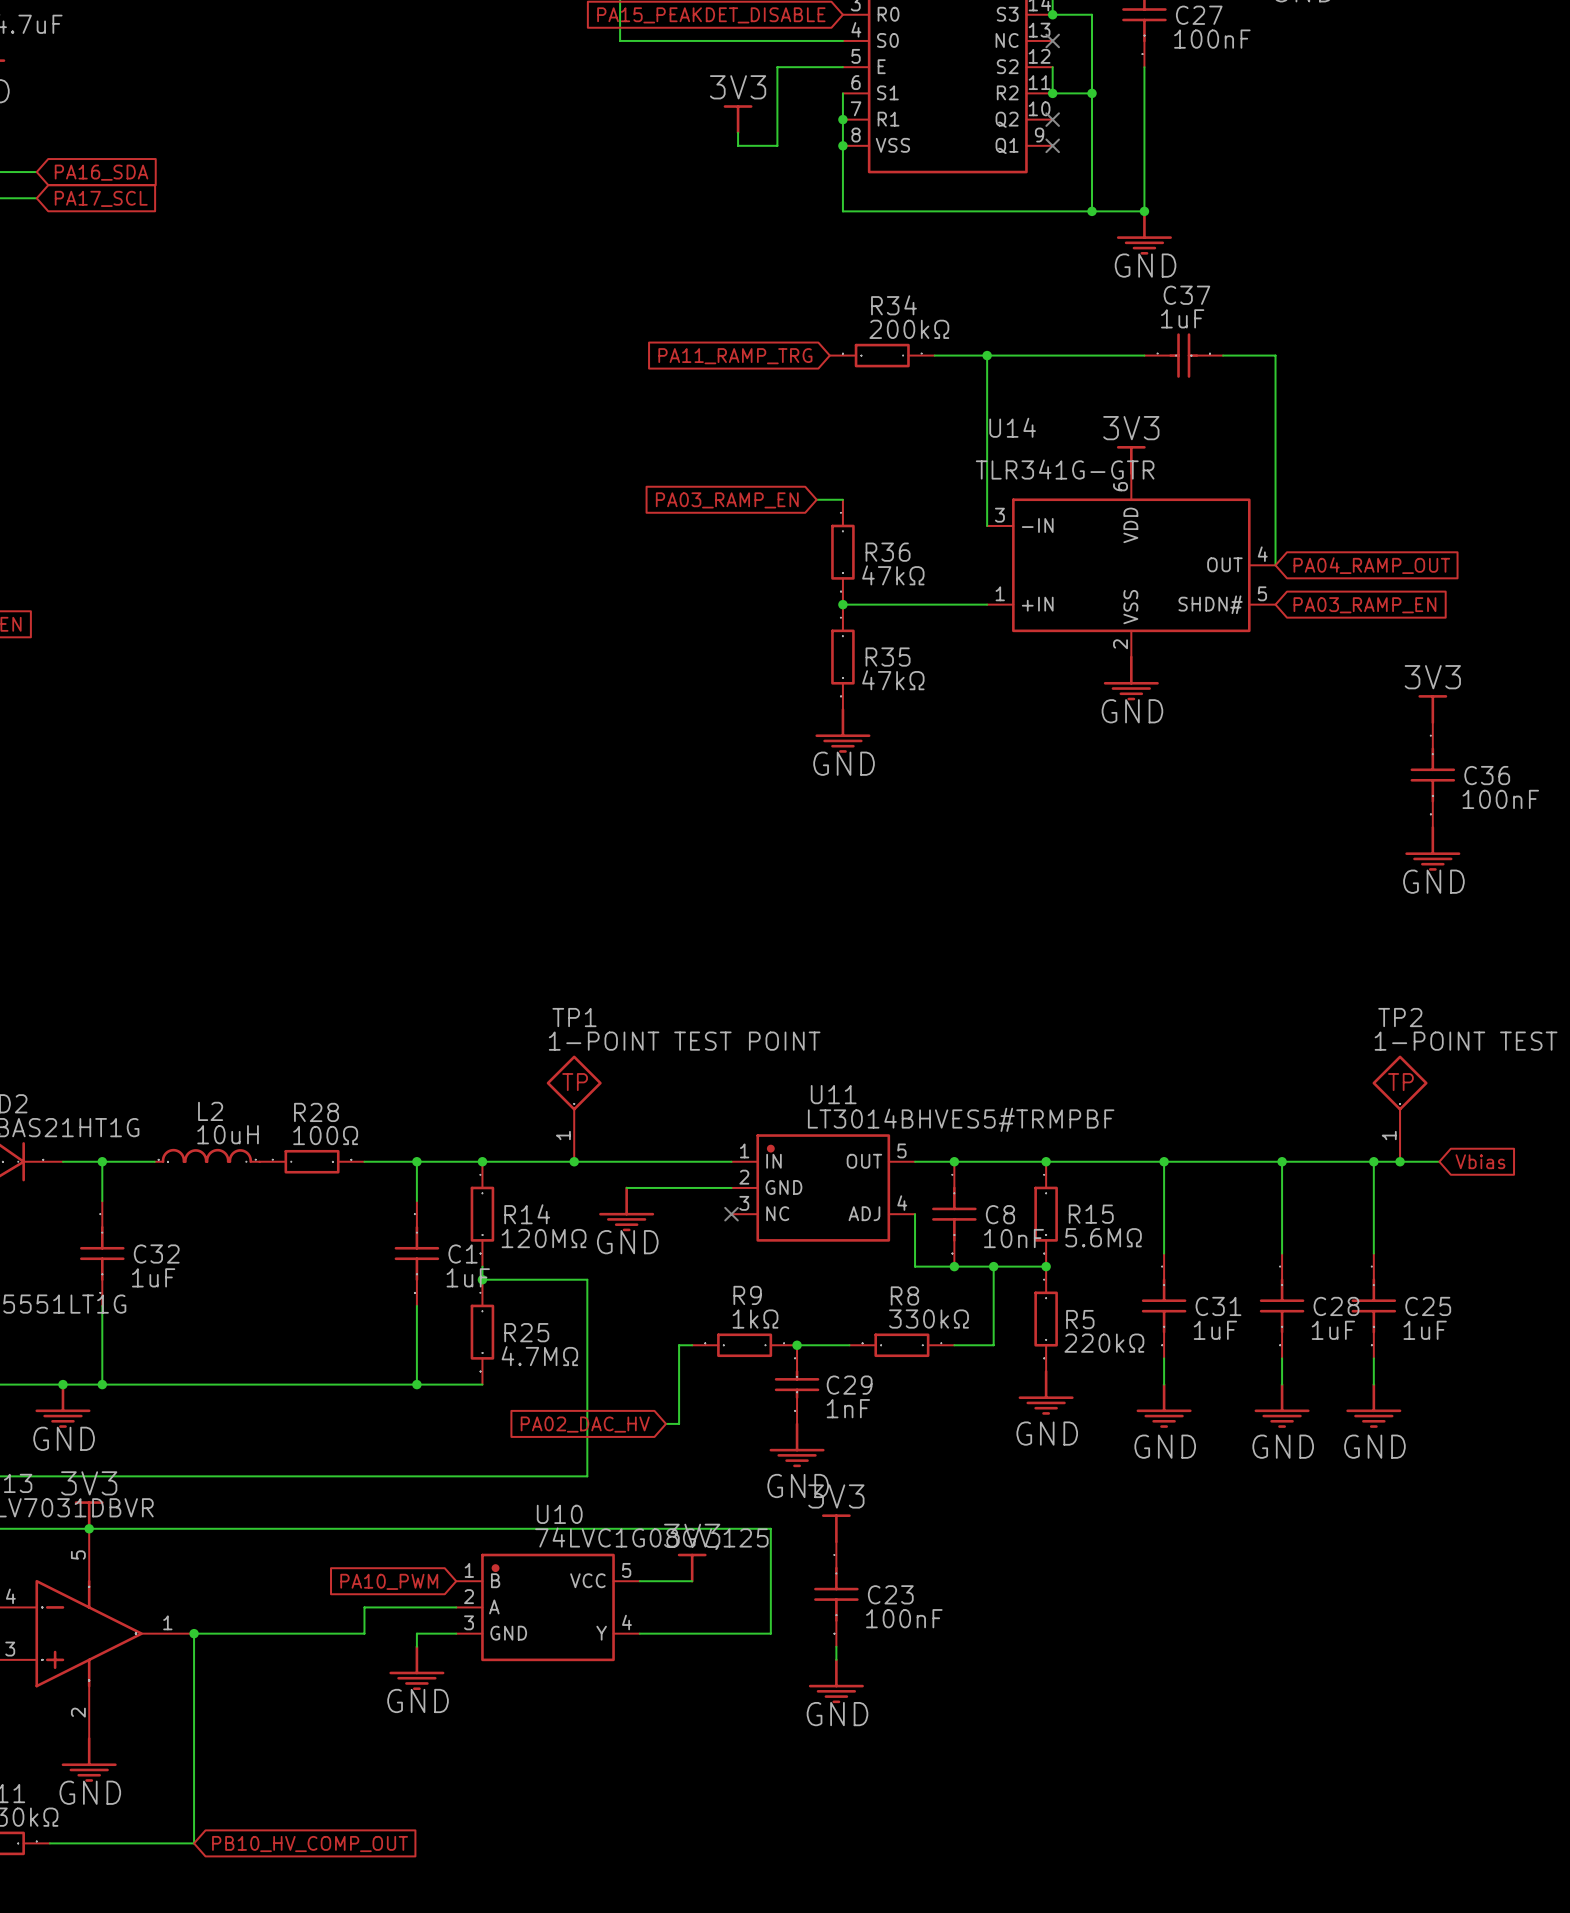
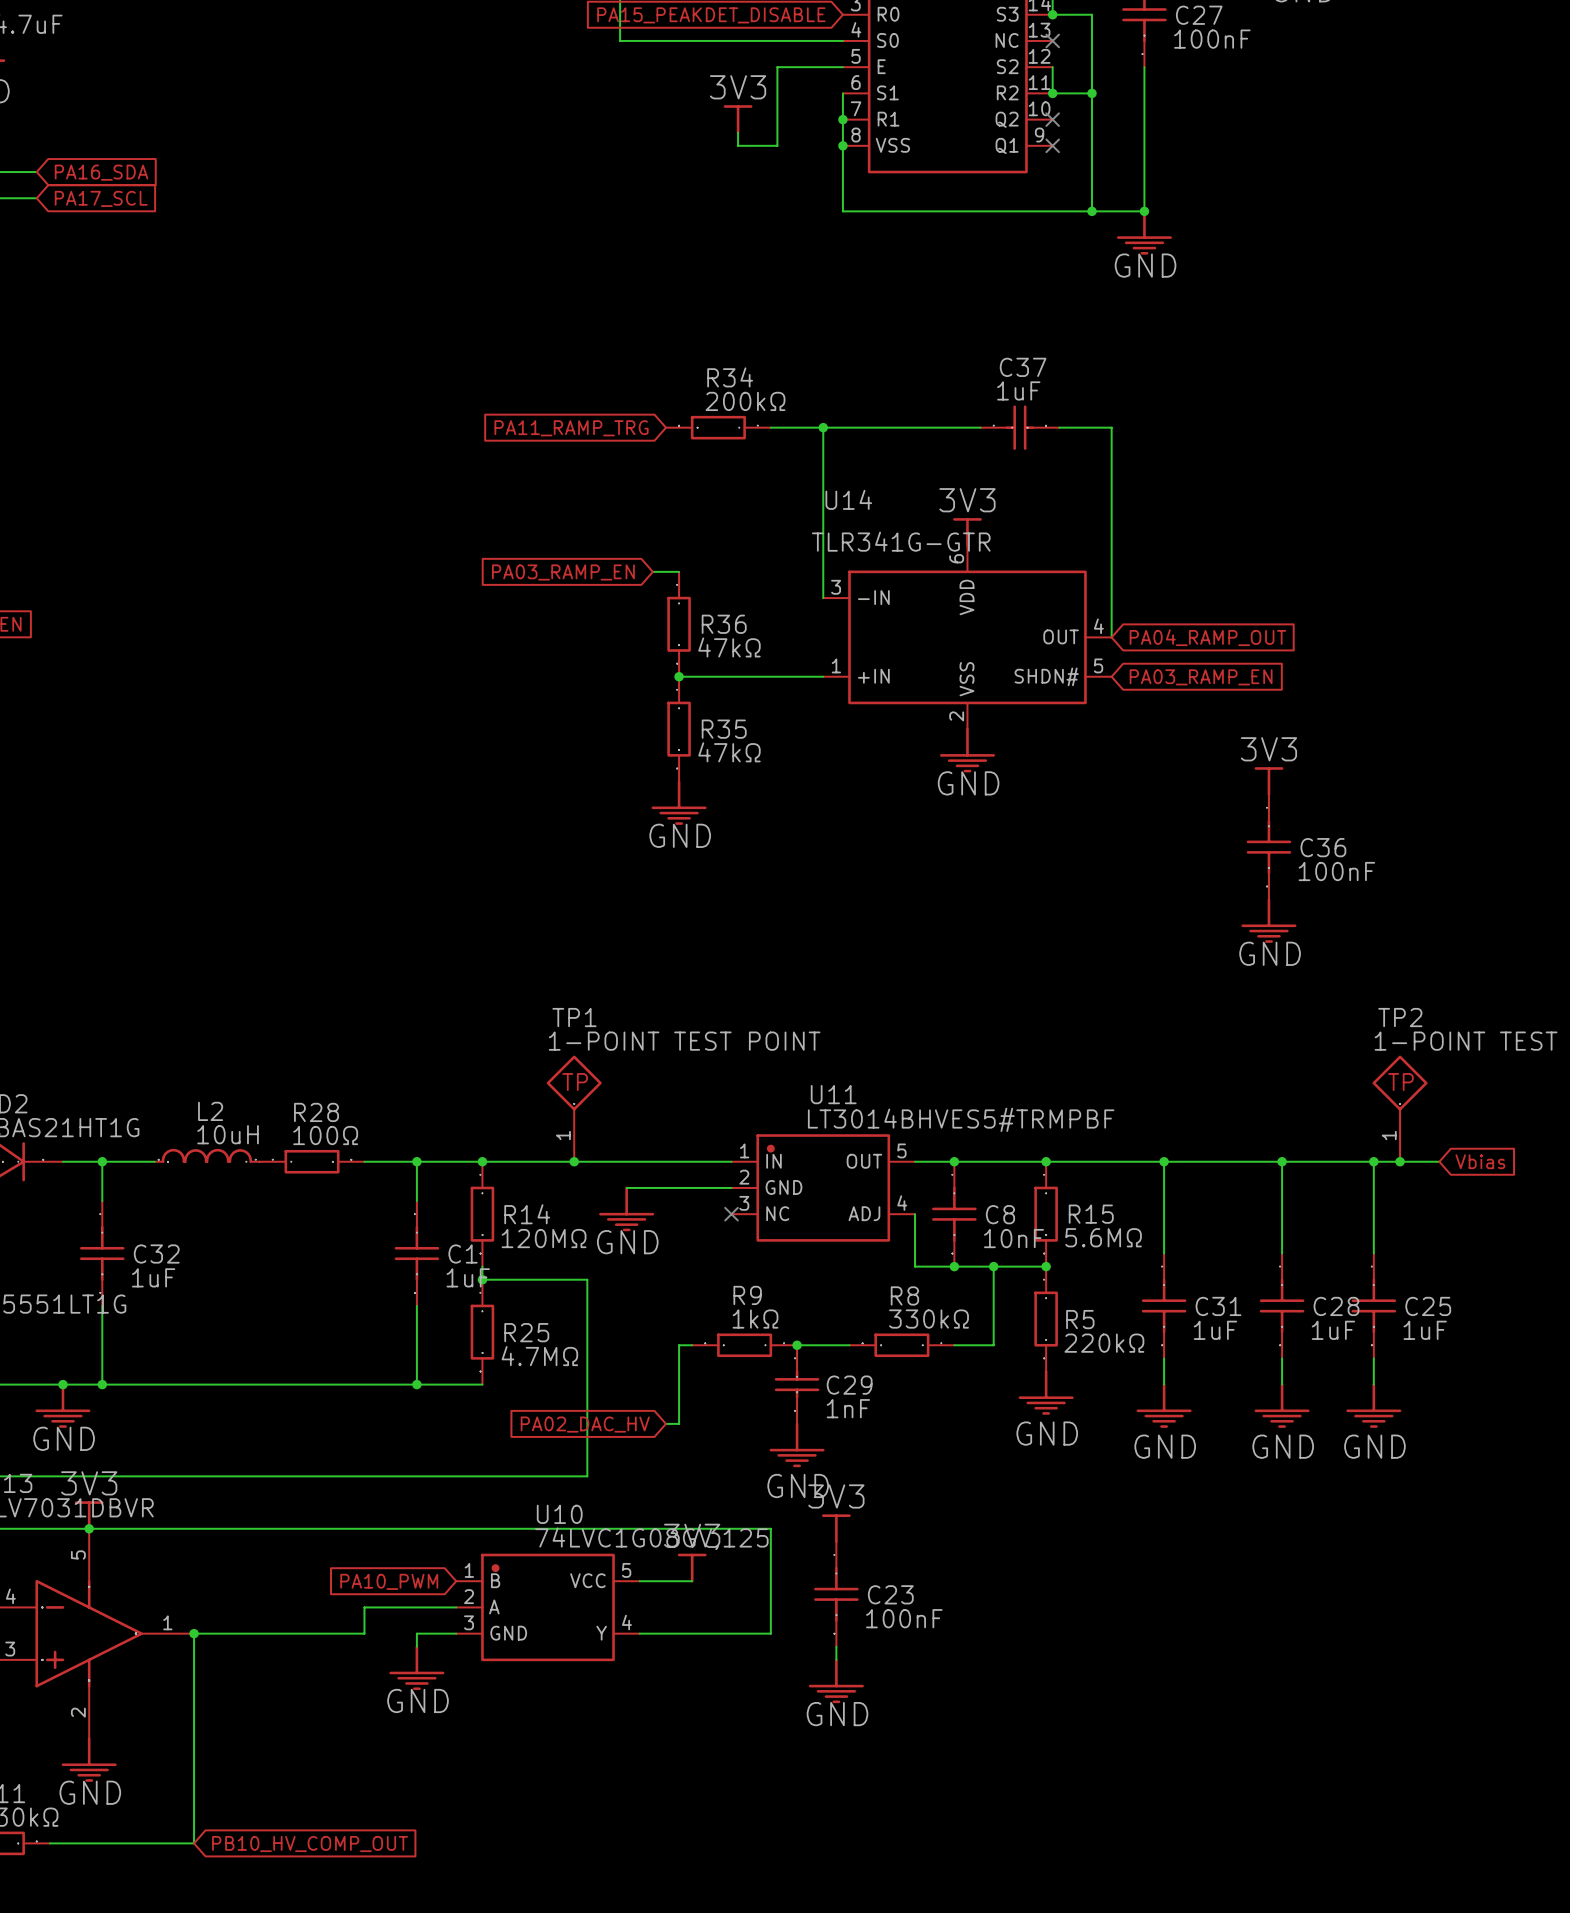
R34 position: (882, 355) -> (718, 427)
wire: (934, 355) (1144, 355) -> (770, 427) (980, 427)
wire: (987, 355) (987, 525) -> (823, 427) (823, 598)
junction: (987, 355) -> none
C37 position: (1183, 355) -> (1019, 427)
wire: (1223, 355) (1275, 355) (1275, 565) -> (1059, 427) (1111, 427) (1111, 637)
global label position: PA11_RAMP_TRG (735, 356) -> PA11_RAMP_TRG (571, 428)
junction: none -> (823, 427)
power symbol: 3V3 (1131, 460) -> none
wire: (816, 499) (842, 499) -> (652, 571) (679, 571)
global label: PA03_RAMP_EN (727, 500) -> none
power symbol: none -> 3V3 (967, 532)
R36 position: (842, 552) -> (679, 624)
U14 position: (1131, 565) -> (967, 637)
global label position: PA04_RAMP_OUT (1371, 565) -> PA04_RAMP_OUT (1207, 637)
global label: none -> PA03_RAMP_EN (563, 572)
wire: (842, 604) (987, 604) -> (679, 676) (823, 676)
junction: (842, 604) -> none
global label: PA03_RAMP_EN (1364, 605) -> none
R35 position: (842, 657) -> (679, 729)
junction: none -> (679, 676)
global label: none -> PA03_RAMP_EN (1201, 677)
power symbol: GND (1131, 678) -> none
power symbol: 3V3 (1432, 709) -> none
power symbol: GND (842, 730) -> none
power symbol: none -> GND (967, 750)
C36 position: (1432, 775) -> (1268, 847)
power symbol: none -> 3V3 (1268, 781)
power symbol: none -> GND (679, 802)
power symbol: GND (1432, 848) -> none
power symbol: none -> GND (1268, 920)

